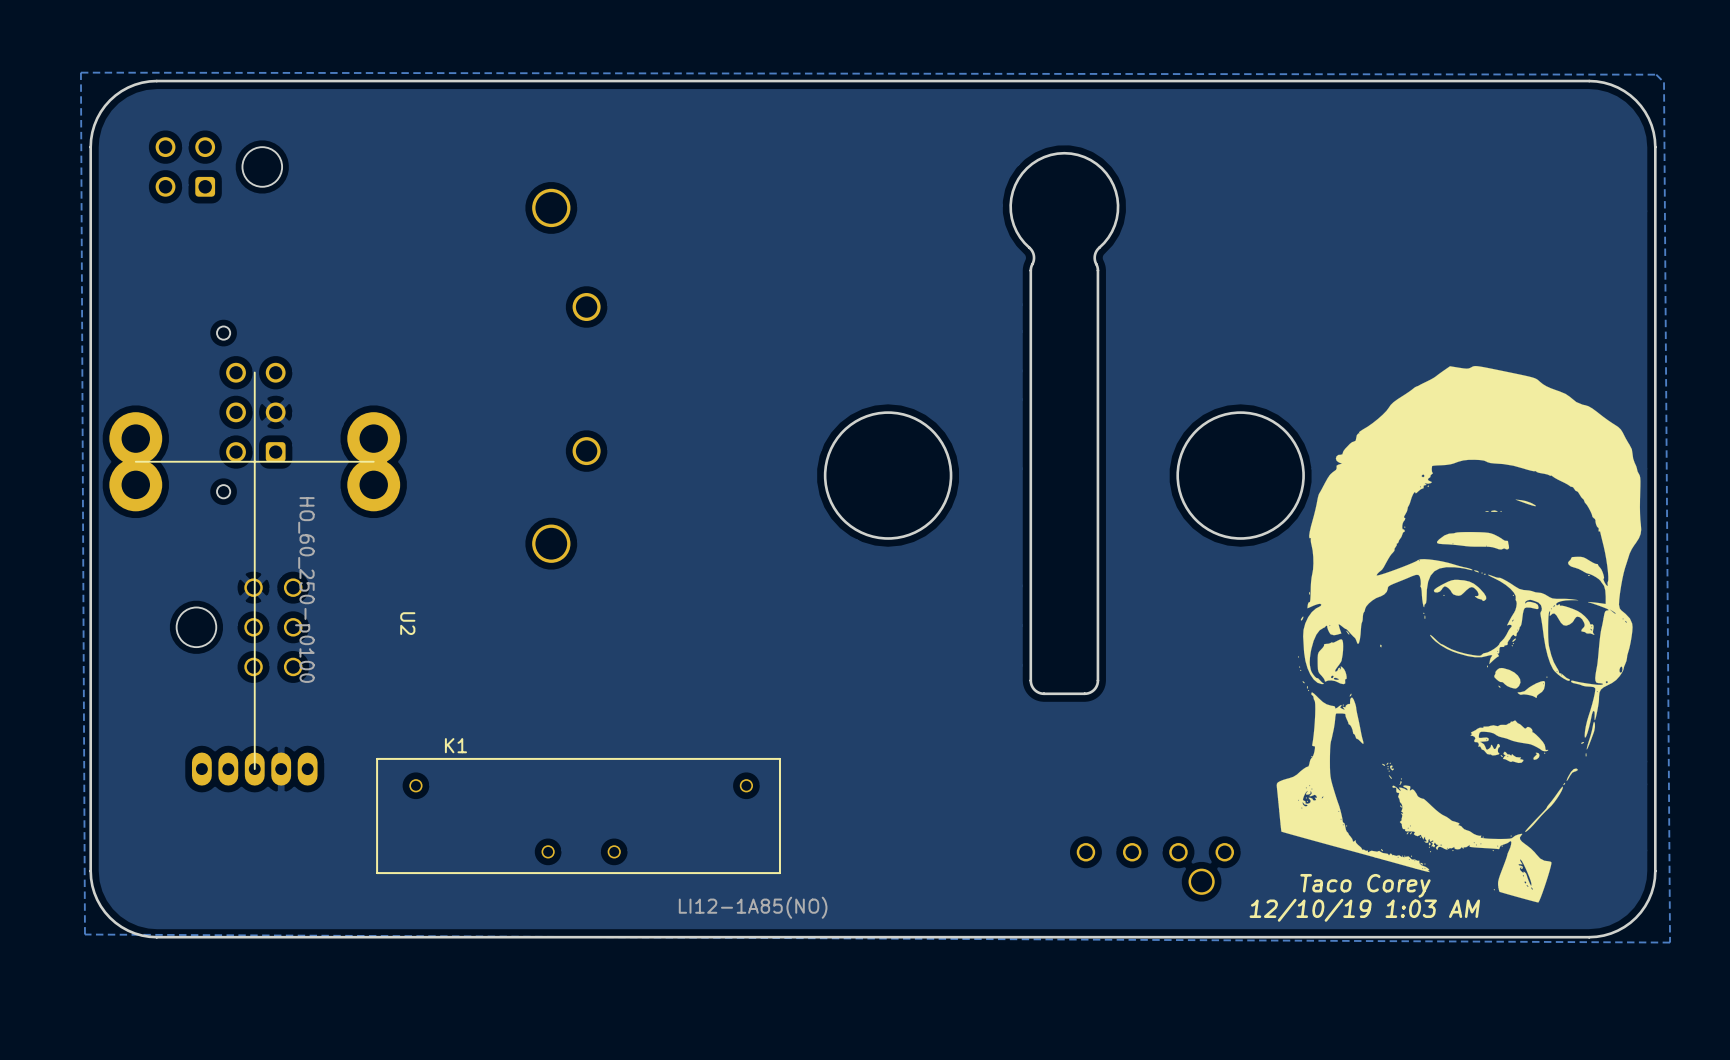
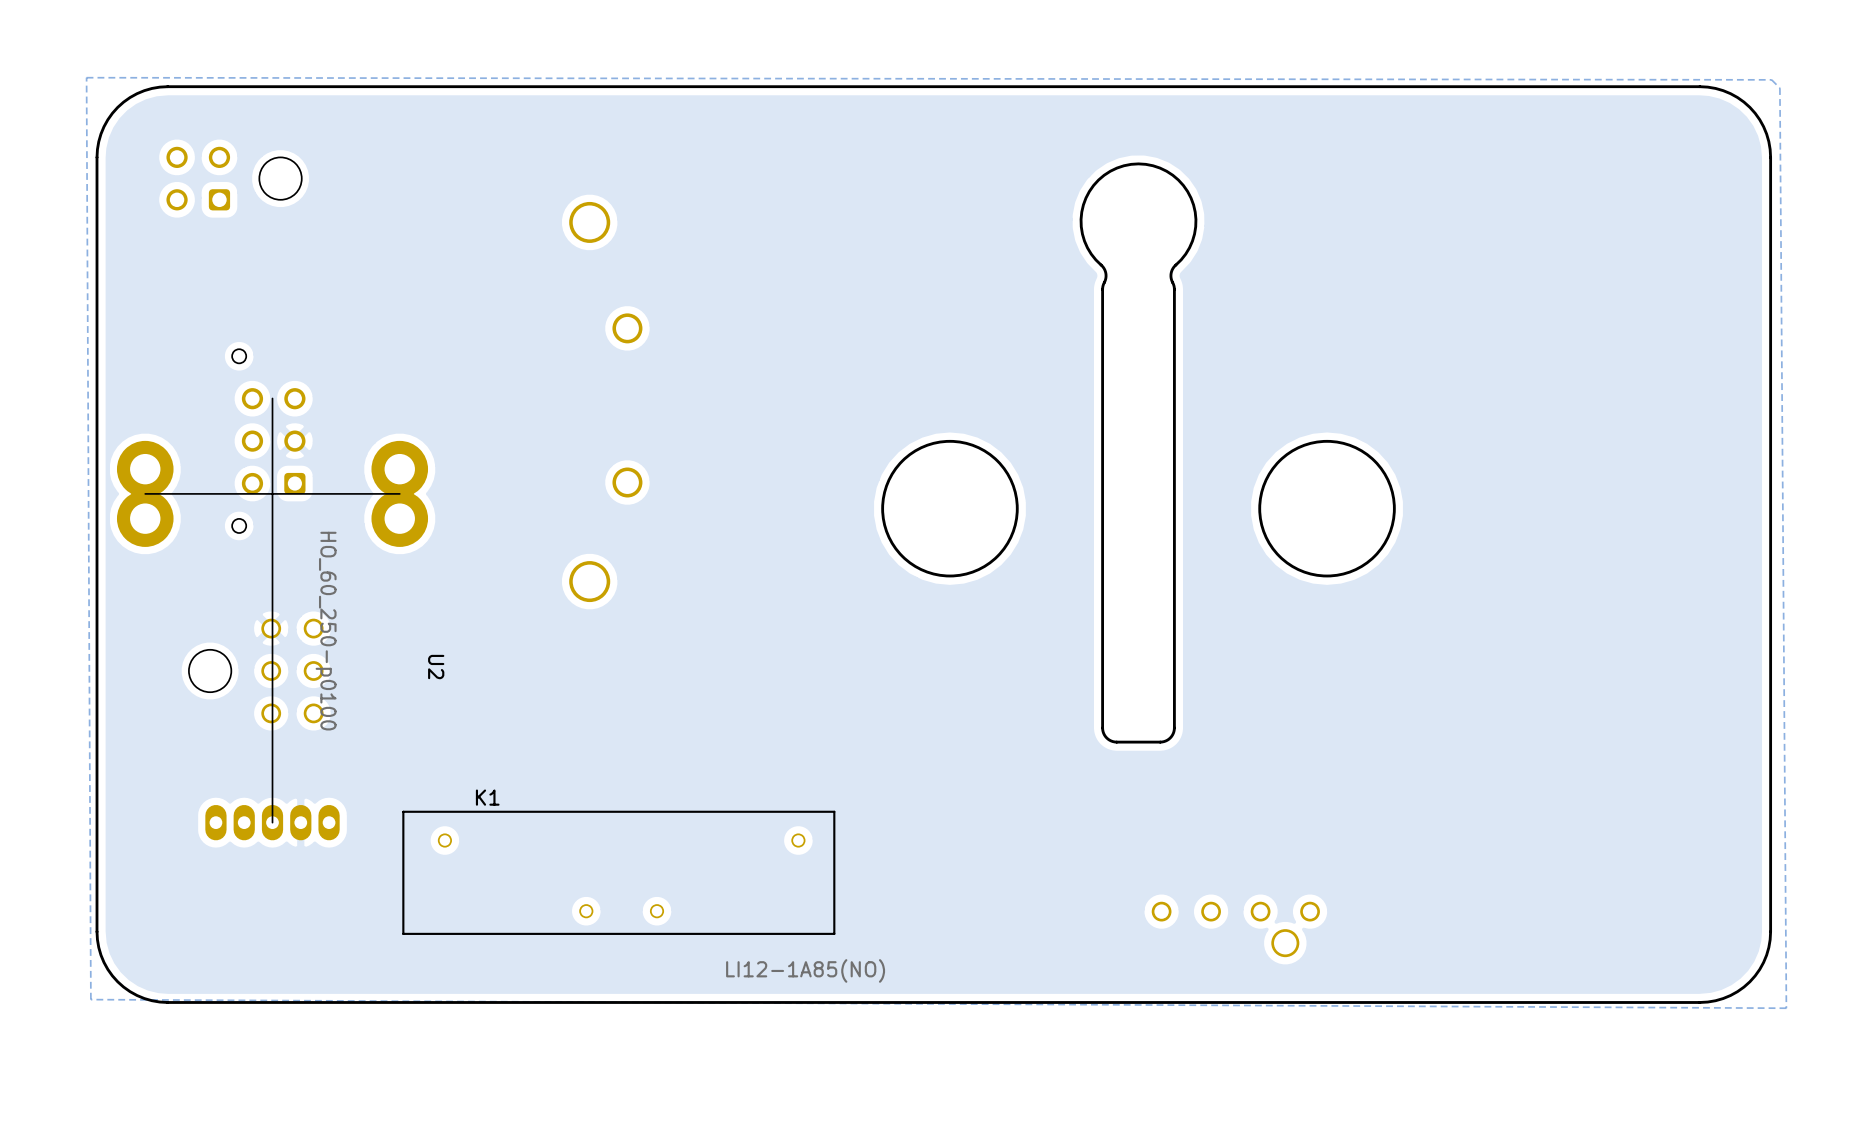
drawing: [1276, 366, 1642, 903] -> none
text: Taco Corey (1365, 885) -> none
text: 12/10/19 1:03 AM (1364, 910) -> none

